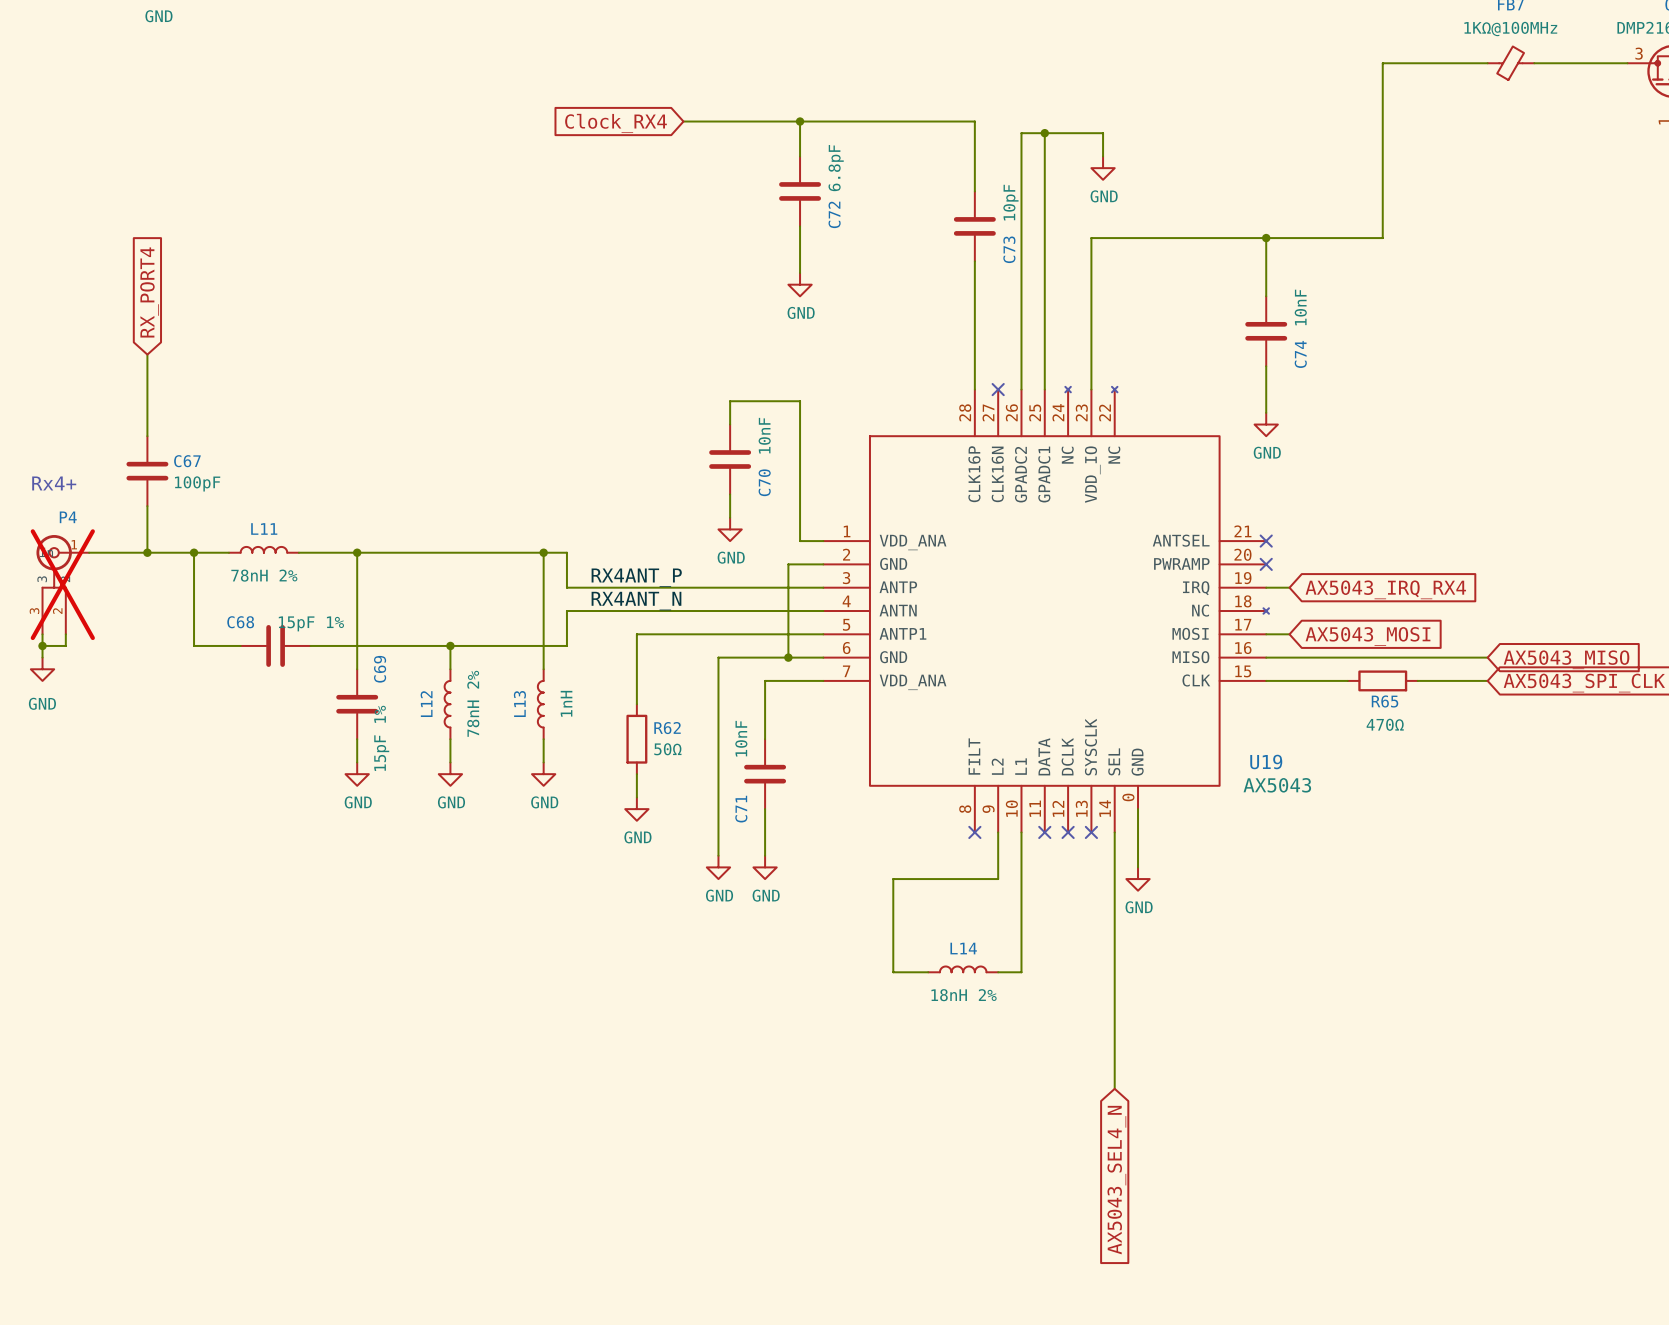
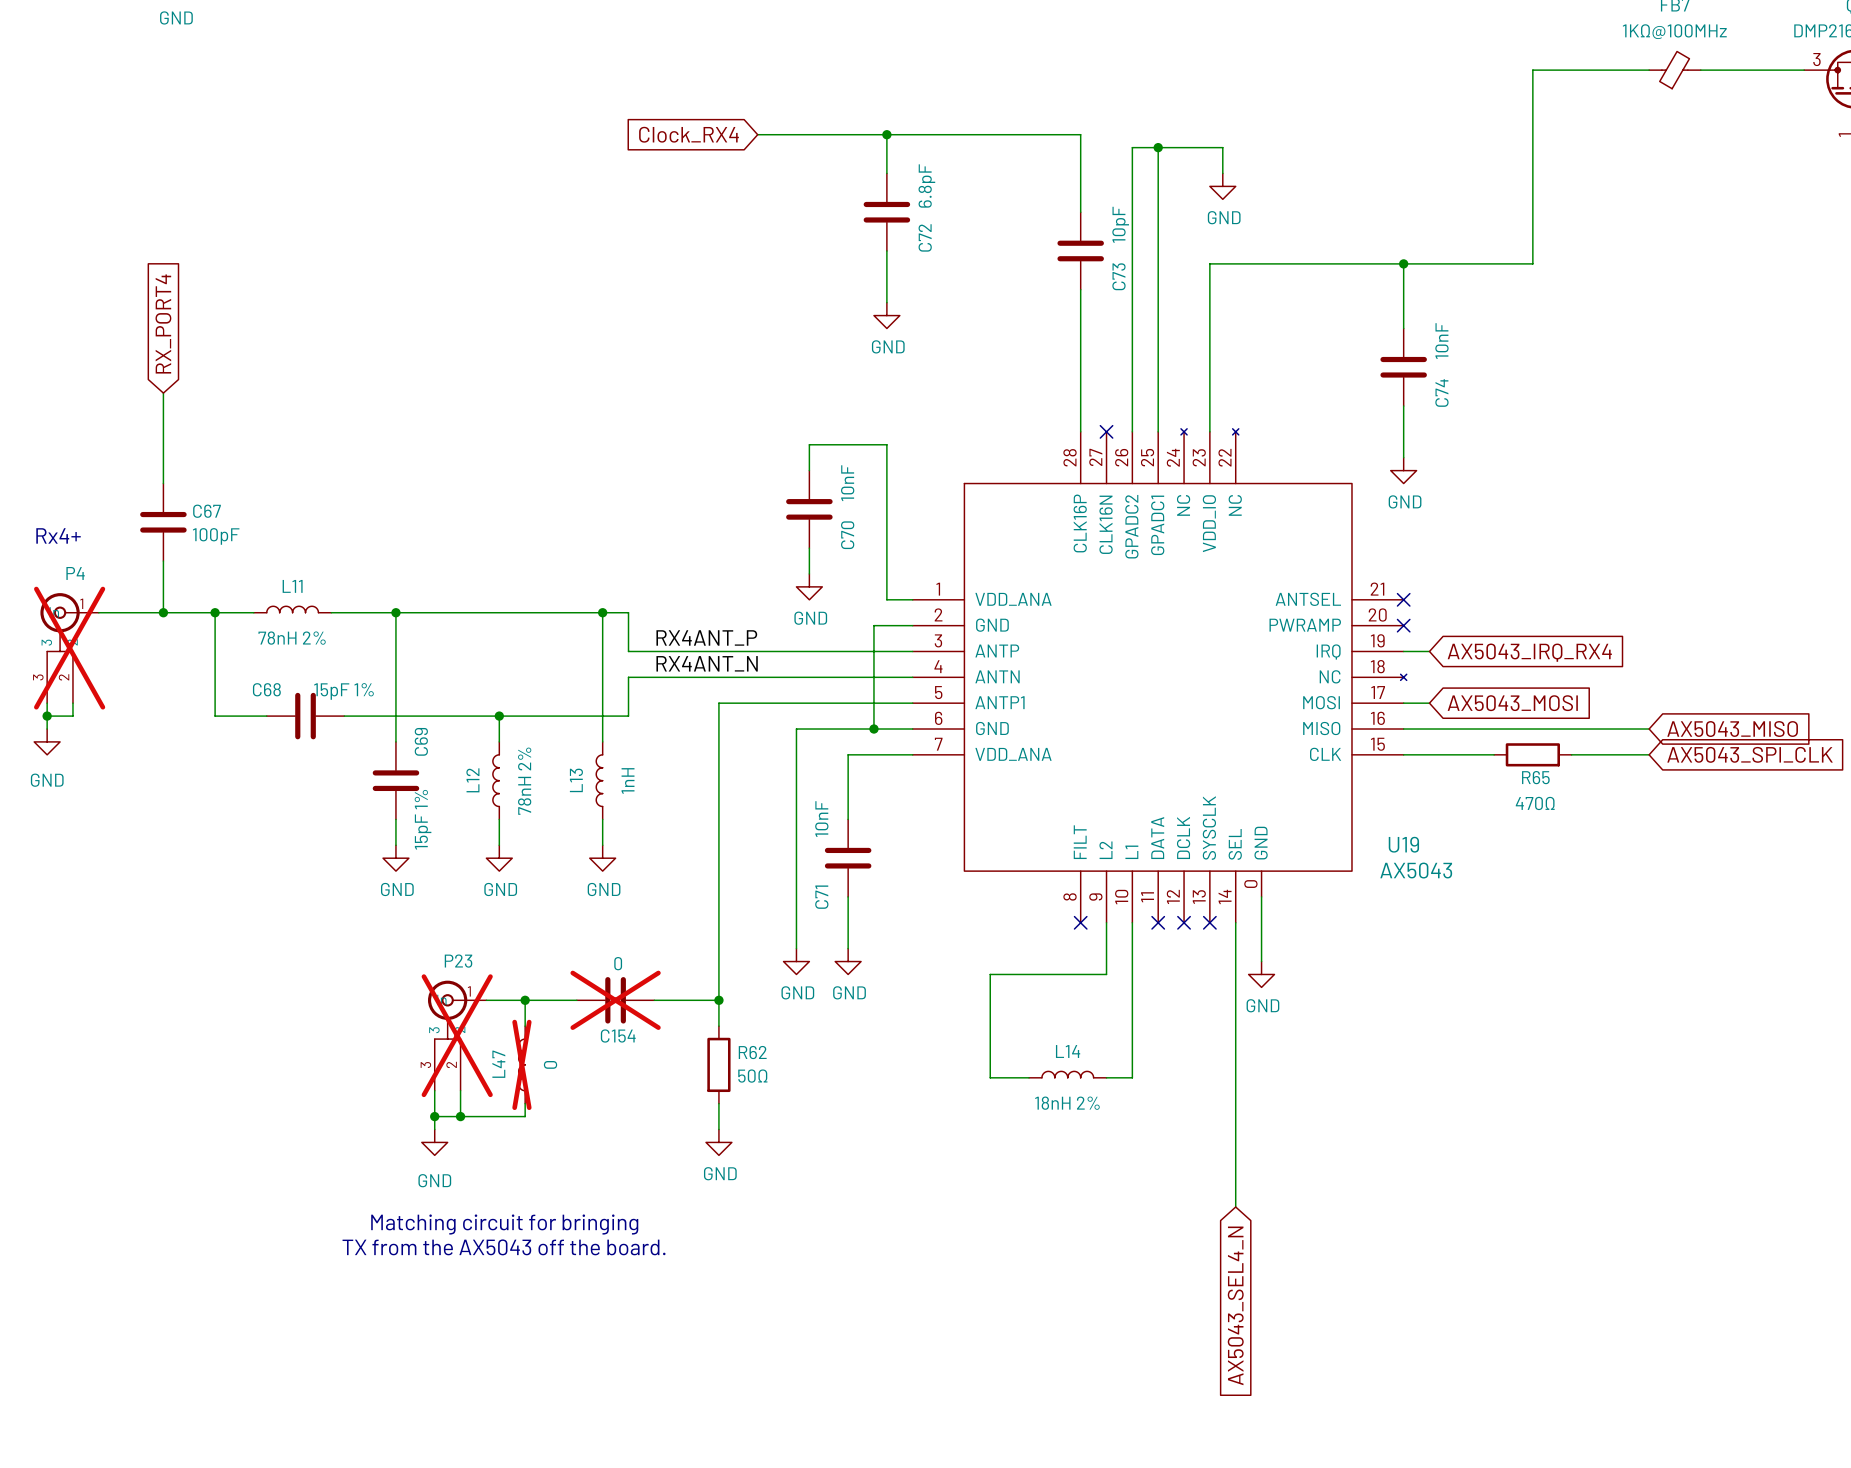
wire: (648, 634) (636, 634) (636, 704) -> (718, 703) (718, 1026)
R62 position: (636, 739) -> (718, 1064)
wire: (636, 774) (636, 797) -> (525, 1000) (525, 1026)
power symbol: GND (636, 809) -> none
wire: none -> (486, 1000) (576, 1000)
junction: none -> (525, 1000)
C154: none -> 0 (615, 1000)
wire: none -> (654, 1000) (718, 1000)
junction: none -> (718, 1000)
P23: none -> (457, 1035)
L47: none -> 0 (521, 1064)
wire: none -> (434, 1090) (434, 1129)
wire: none -> (460, 1090) (460, 1116)
wire: none -> (525, 1103) (525, 1116) (434, 1116)
wire: none -> (718, 1103) (718, 1129)
junction: none -> (434, 1116)
junction: none -> (460, 1116)
power symbol: none -> GND (434, 1142)
power symbol: none -> GND (718, 1142)
text: none -> Matching circuit for bringing (504, 1224)
text: none -> TX from the AX5043 off the board. (504, 1247)

